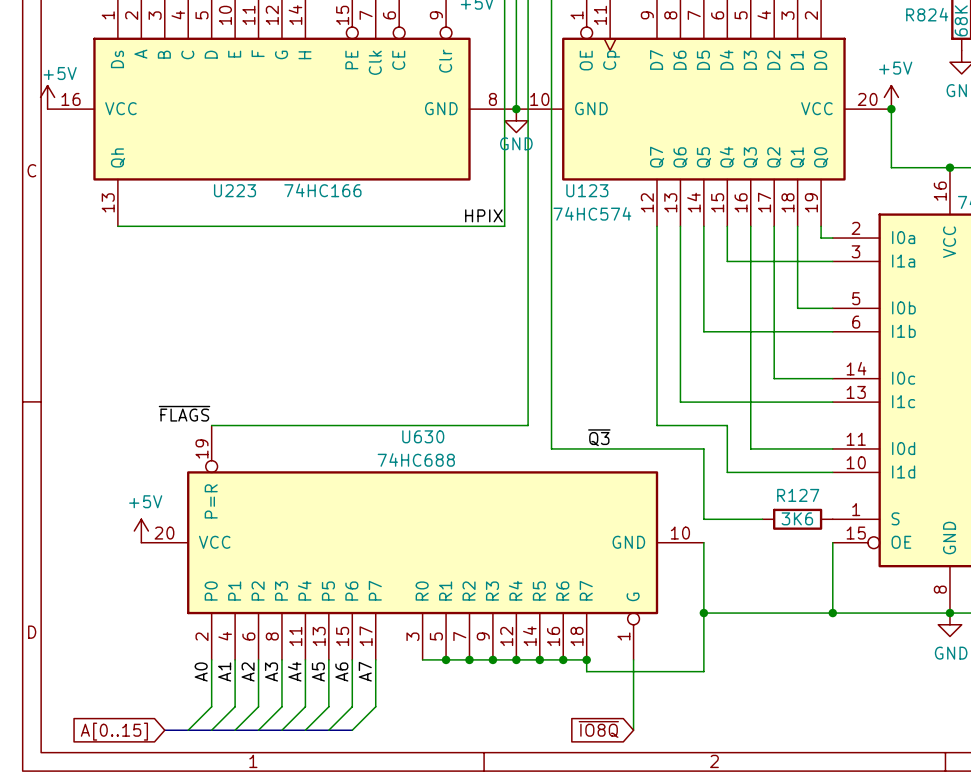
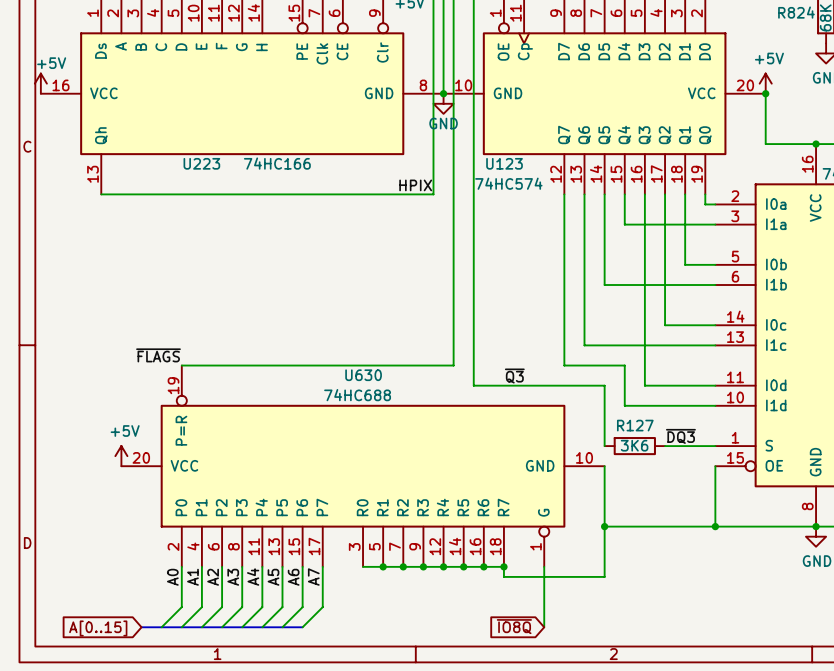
label: none -> ~{DQ3} (680, 436)
wire: (703, 519) (762, 519) -> (665, 446) (715, 446)
R127 position: (797, 519) -> (634, 446)

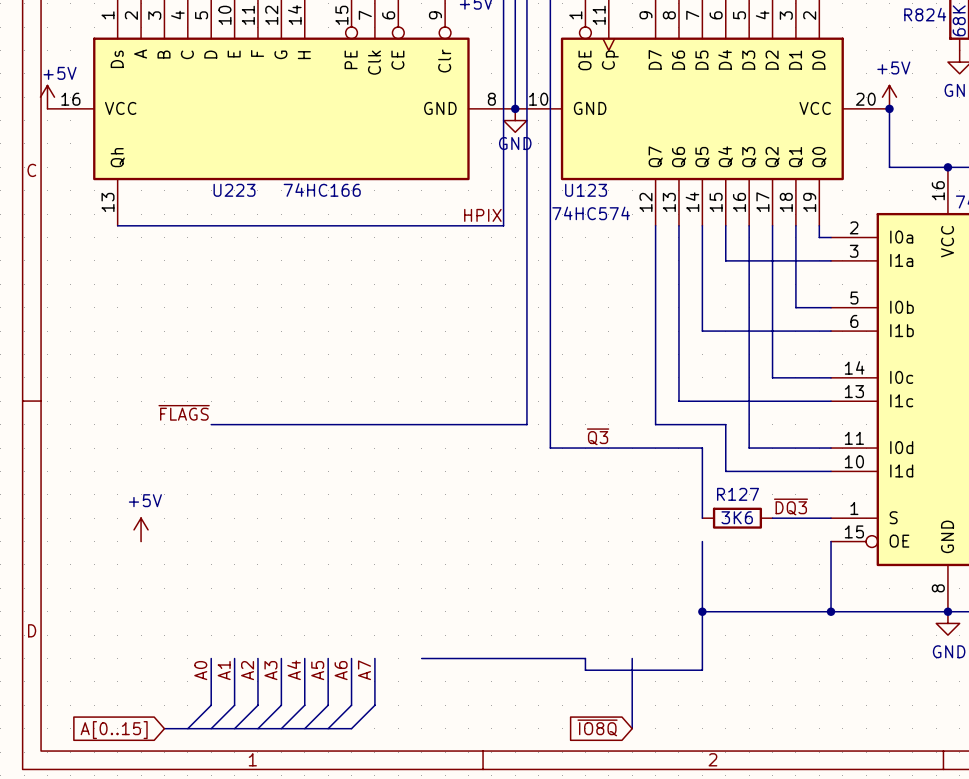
U630: 74HC688 (363, 466) -> none
junction: (383, 566) -> none
junction: (403, 566) -> none
junction: (423, 566) -> none
junction: (443, 566) -> none
junction: (463, 566) -> none
junction: (483, 566) -> none
junction: (503, 566) -> none

